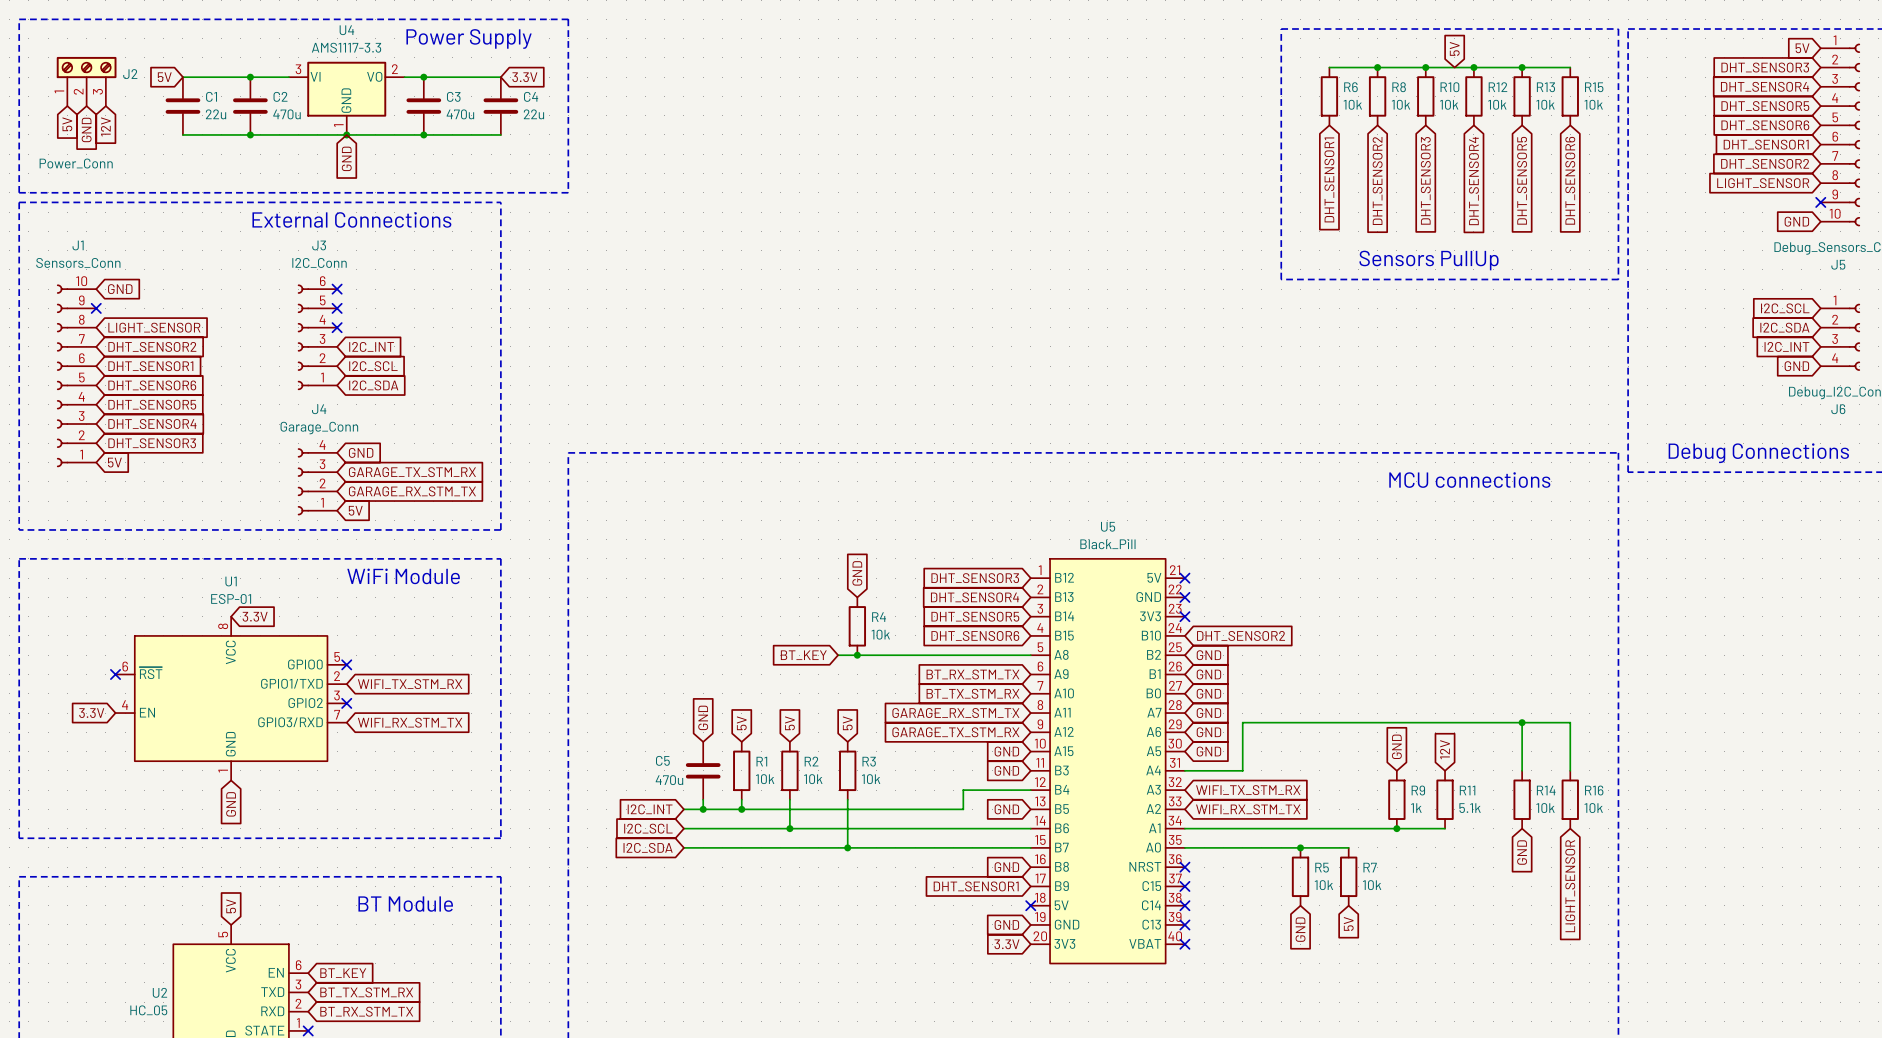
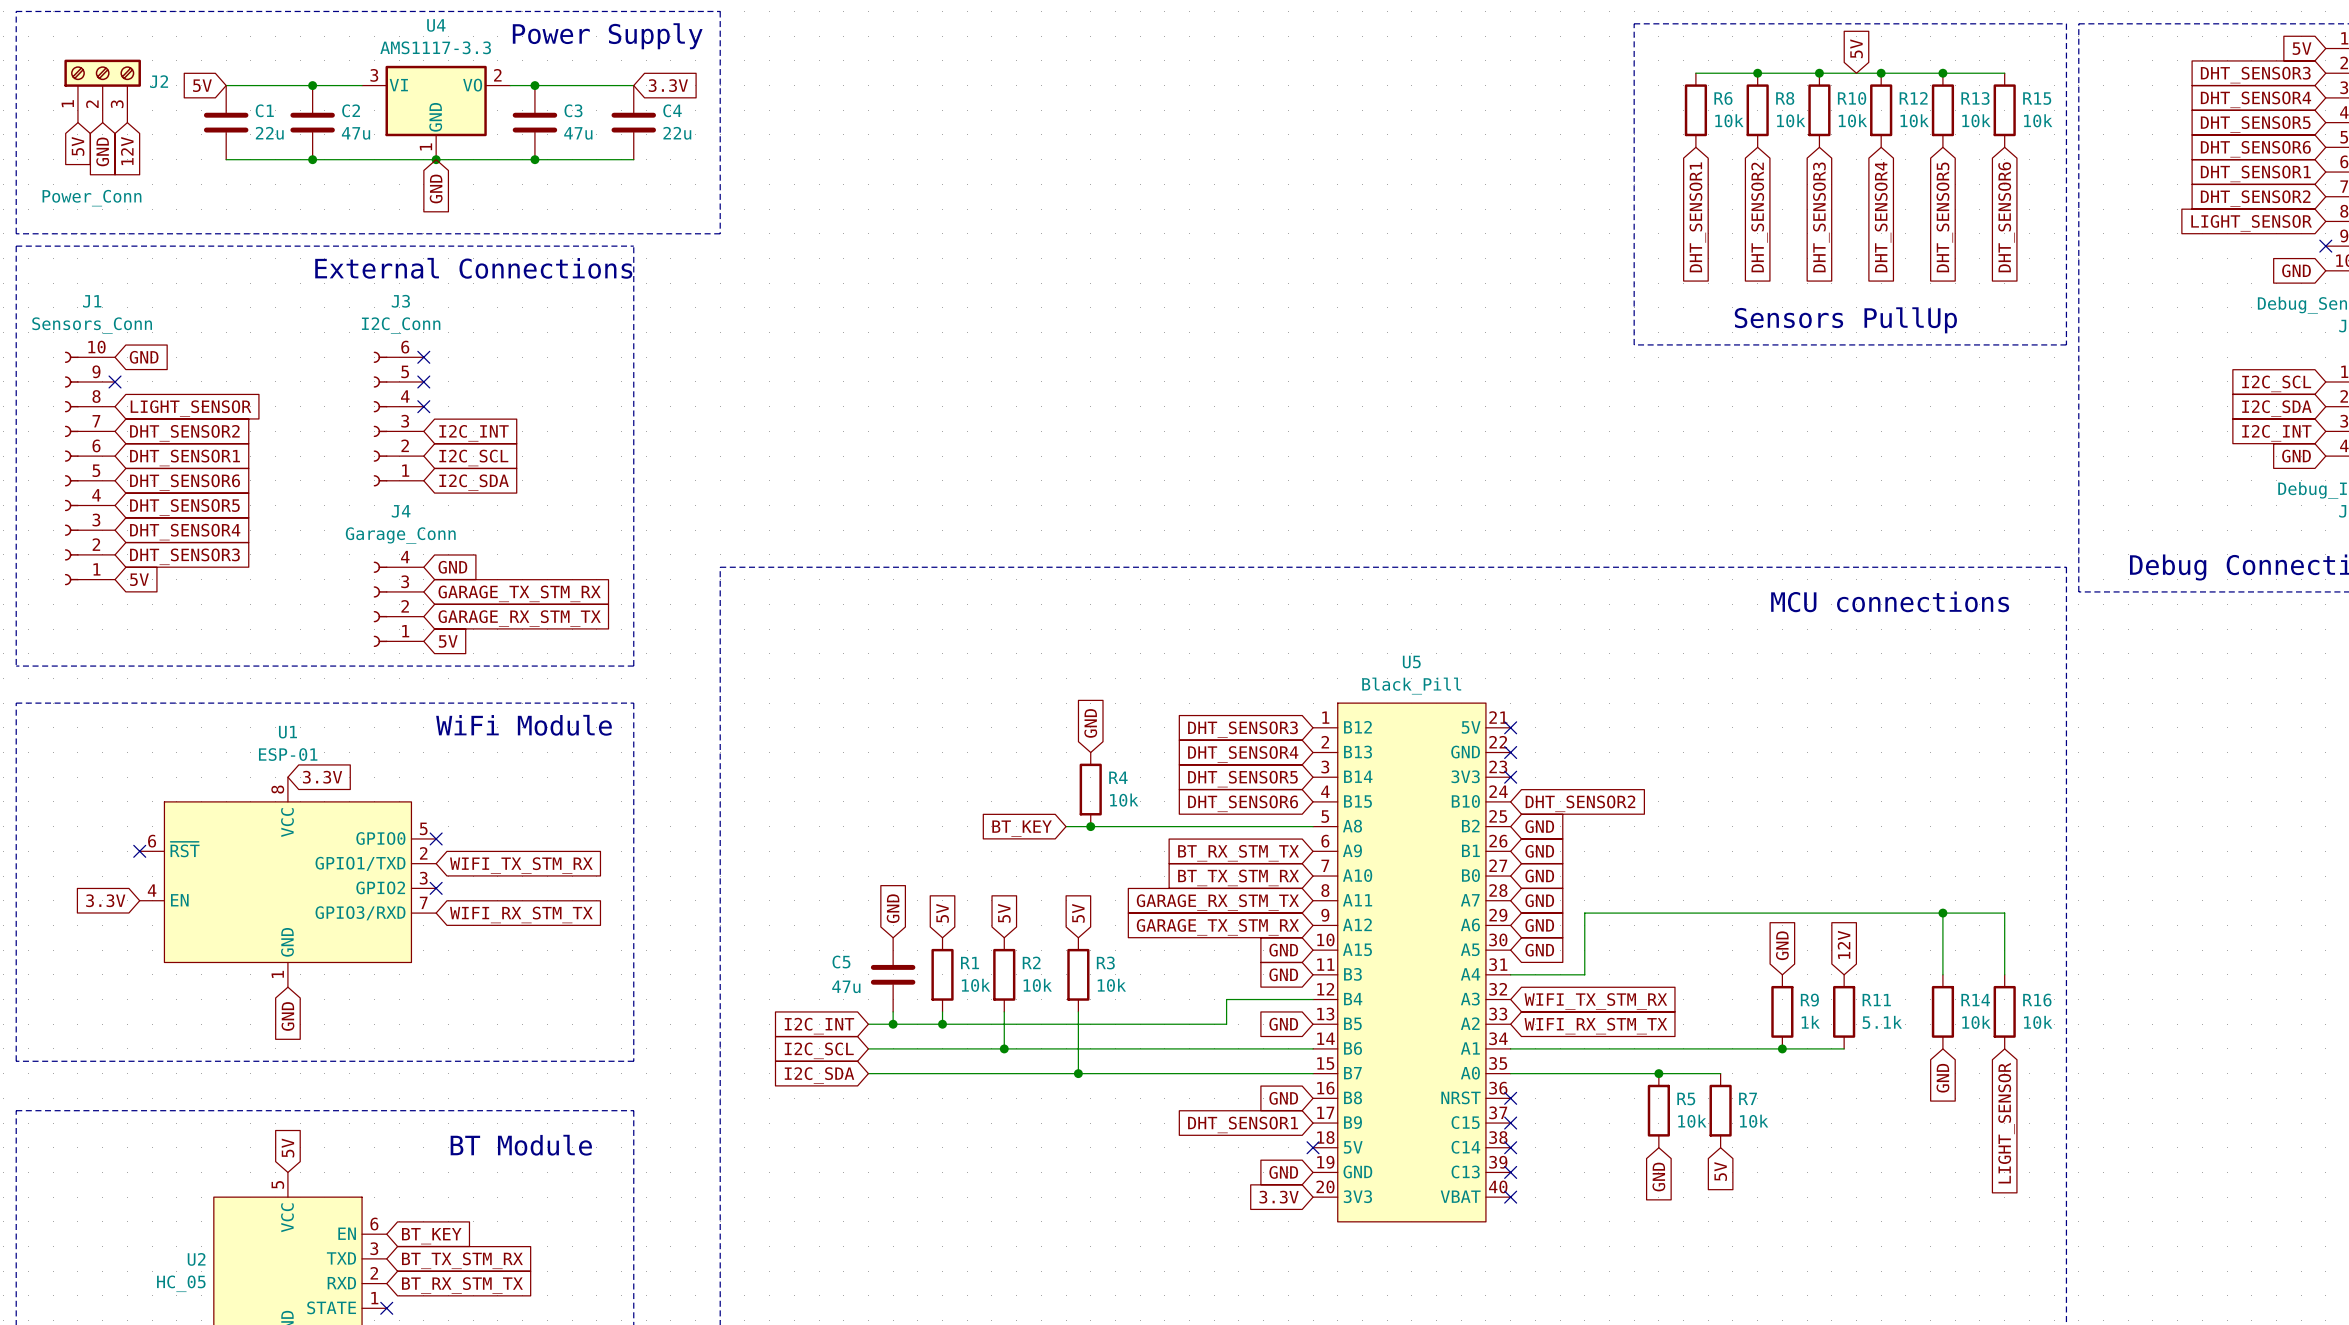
C2 value: 470u (286, 114) -> 47u (356, 133)
C3 value: 470u (460, 114) -> 47u (578, 133)
C5 value: 470u (669, 780) -> 47u (846, 986)

